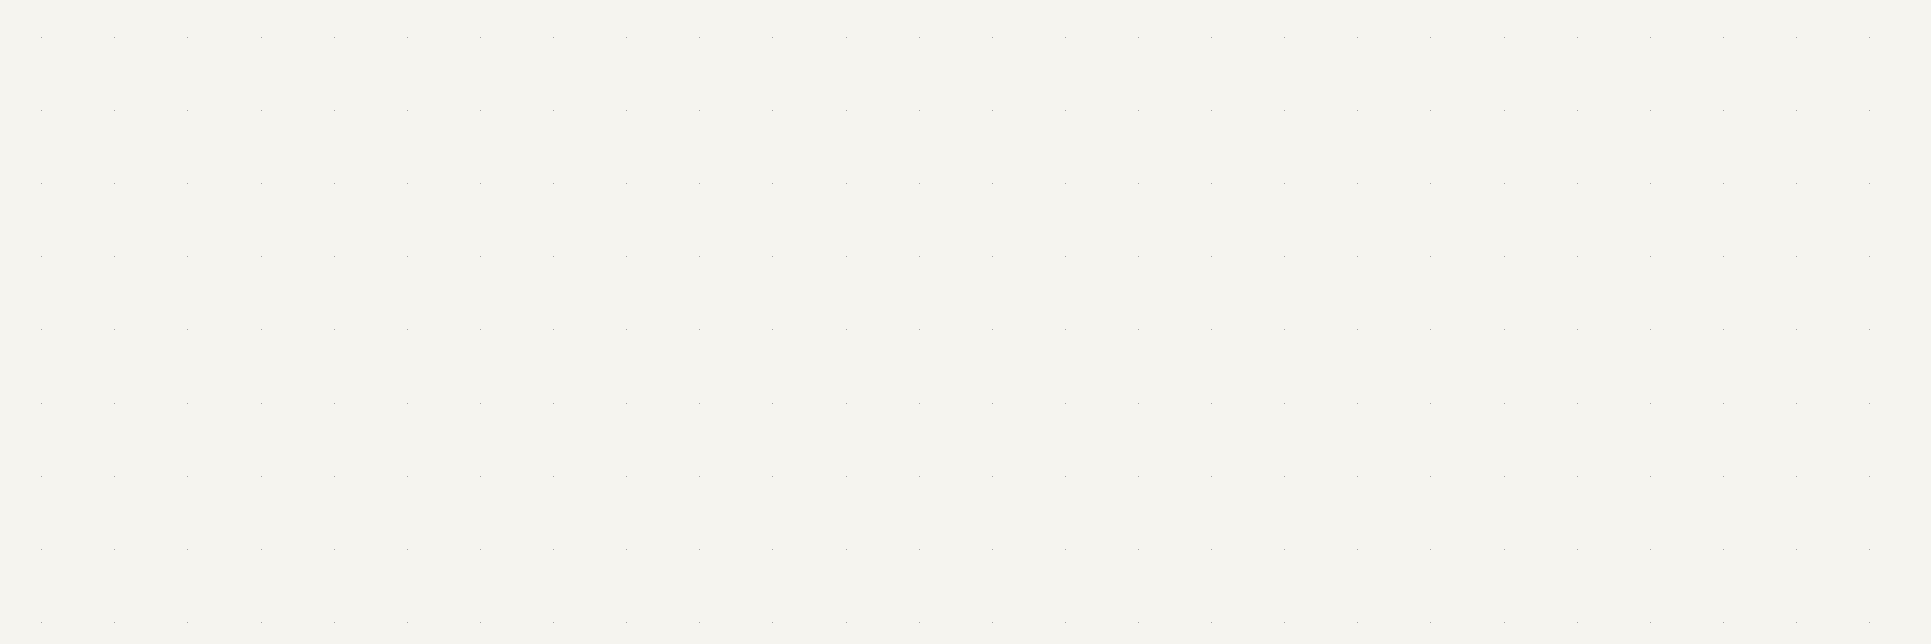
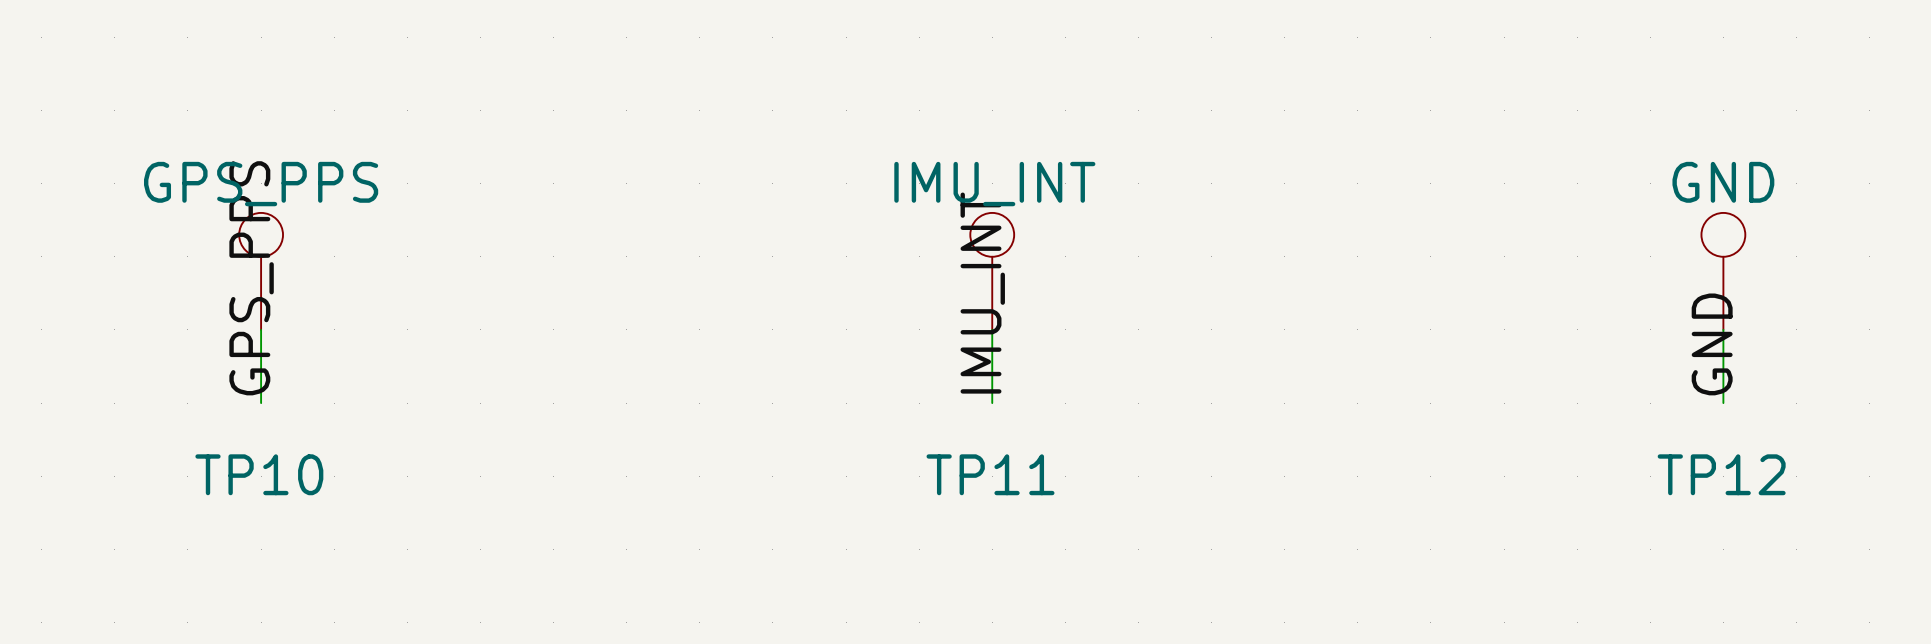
TP10: none -> GPS_PPS (261, 271)
TP11: none -> IMU_INT (992, 271)
TP12: none -> GND (1723, 271)
label: none -> GPS_PPS (251, 278)
label: none -> IMU_INT (982, 293)
wire: none -> (261, 329) (261, 403)
wire: none -> (992, 329) (992, 403)
wire: none -> (1723, 329) (1723, 403)
label: none -> GND (1712, 344)

